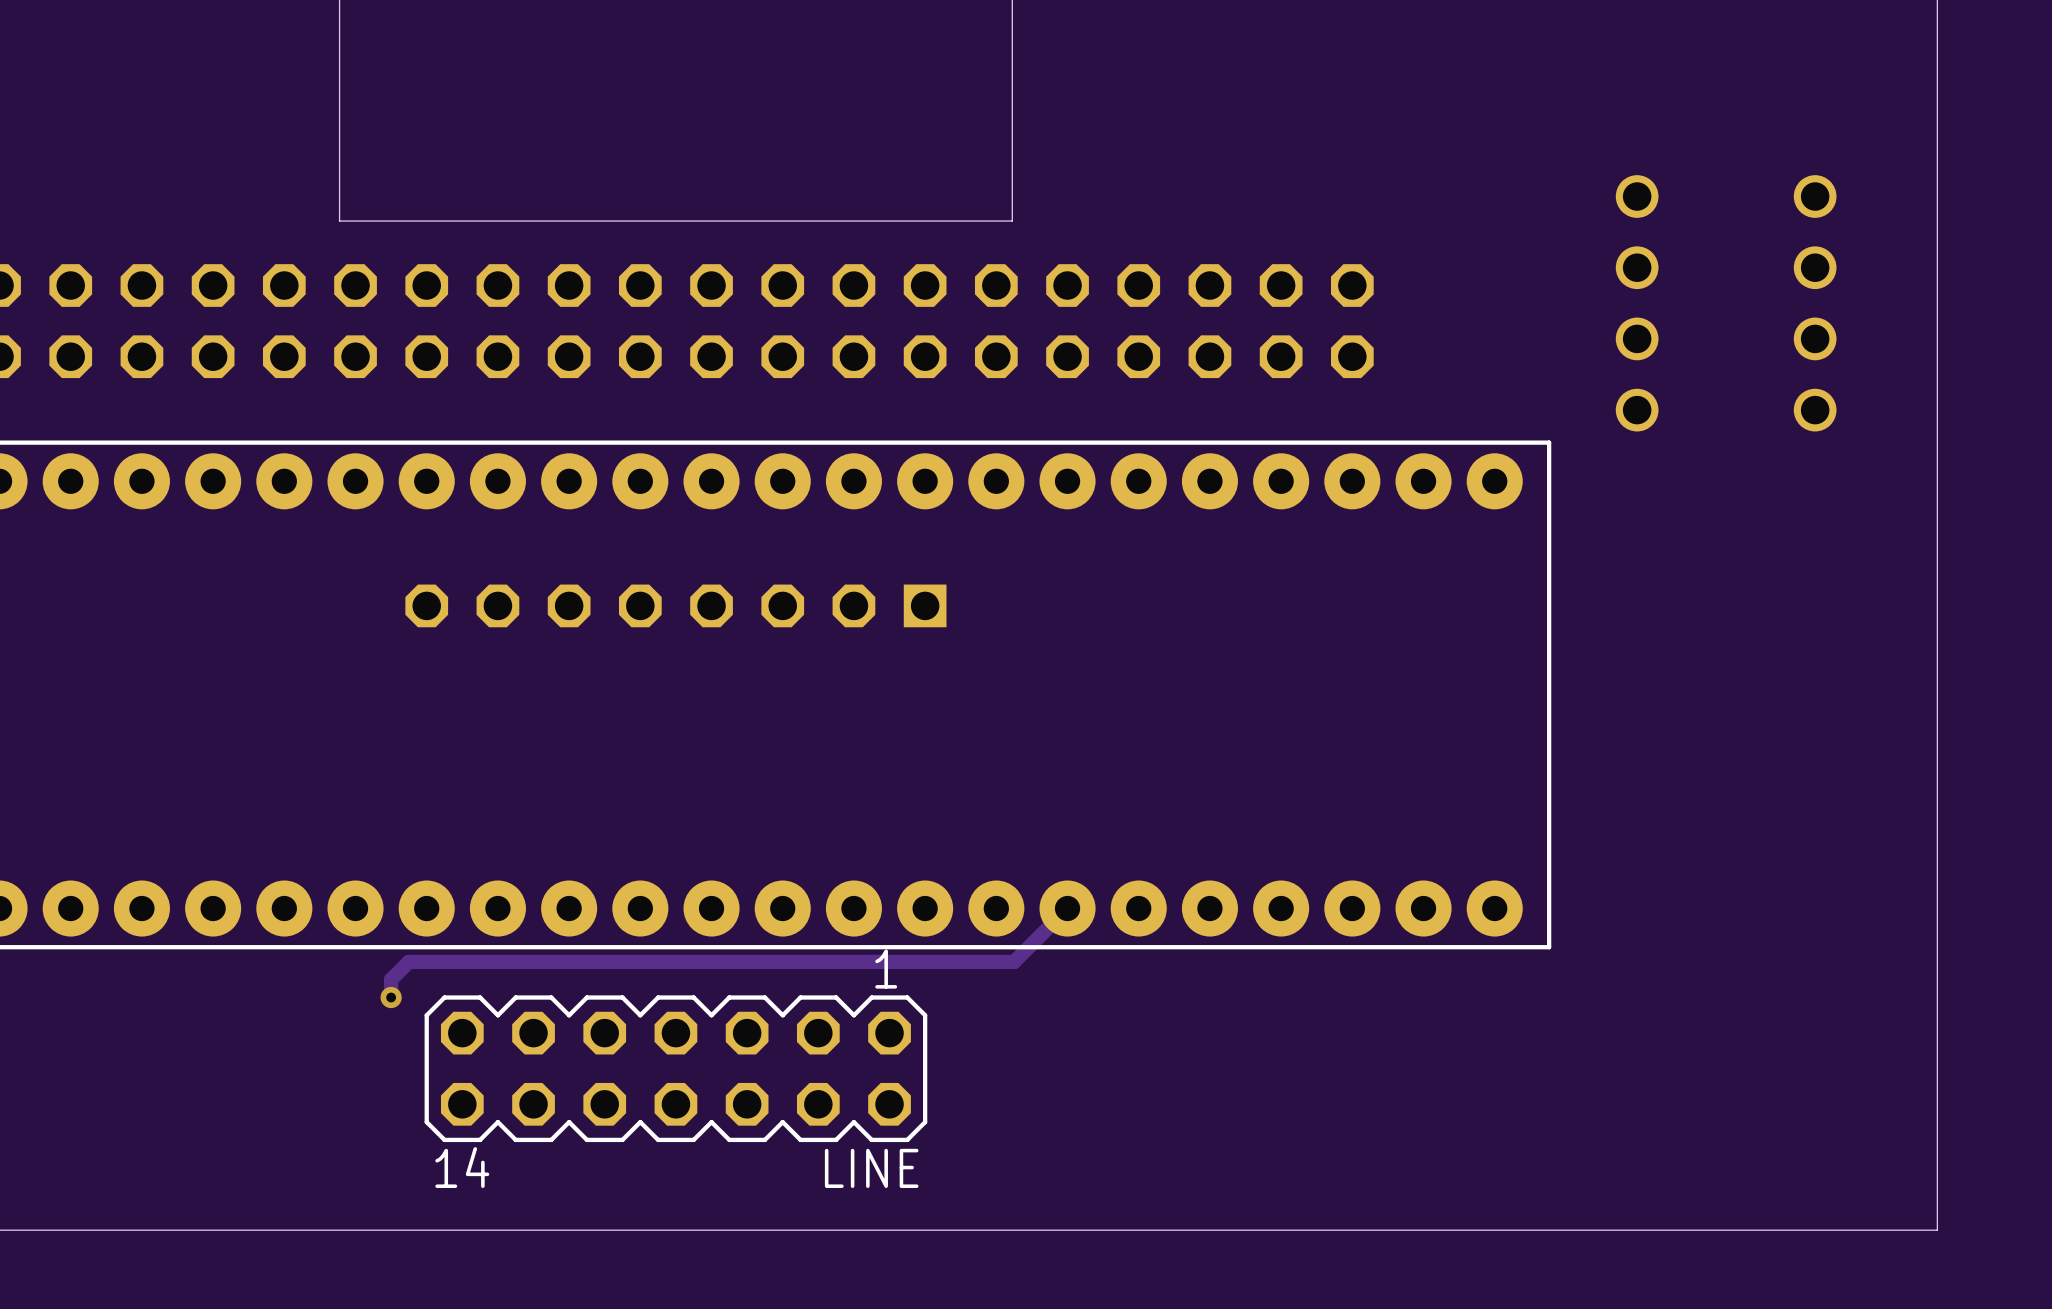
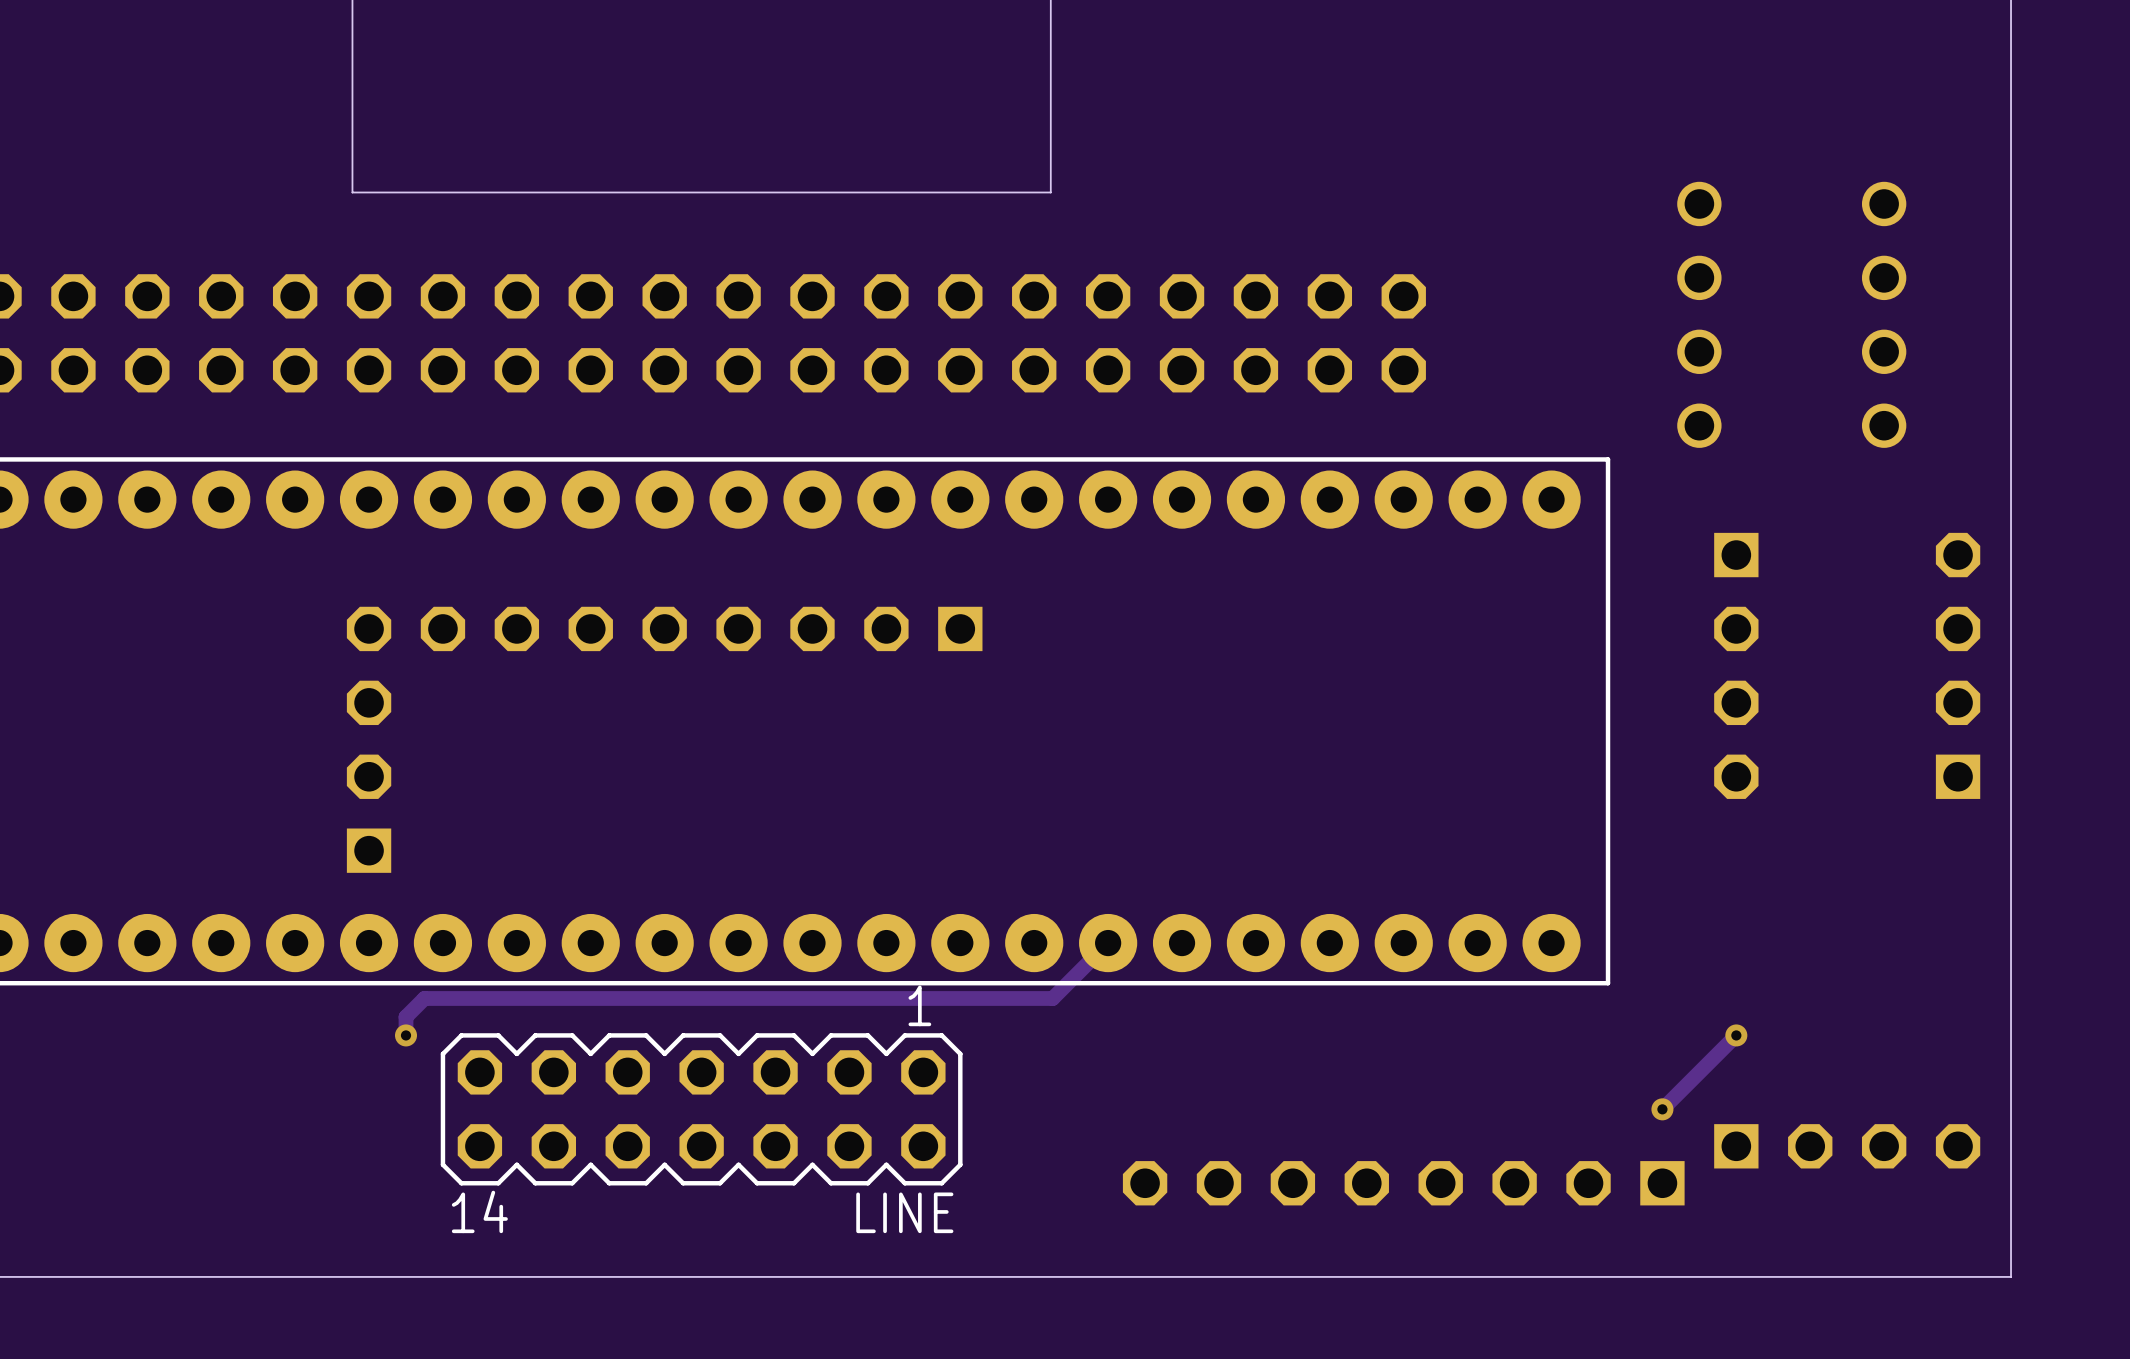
board edge: (1012, 185) (1012, 221) (339, 221) (339, 185) -> (1050, 192) (352, 192)
part: none -> (1736, 665)
part: none -> (1958, 665)
part: none -> (369, 739)
track: none -> (1736, 1035) (1662, 1109)
via: none -> (1736, 1035)
via: none -> (1662, 1109)
part: none -> (1847, 1146)
part: none -> (1403, 1183)

